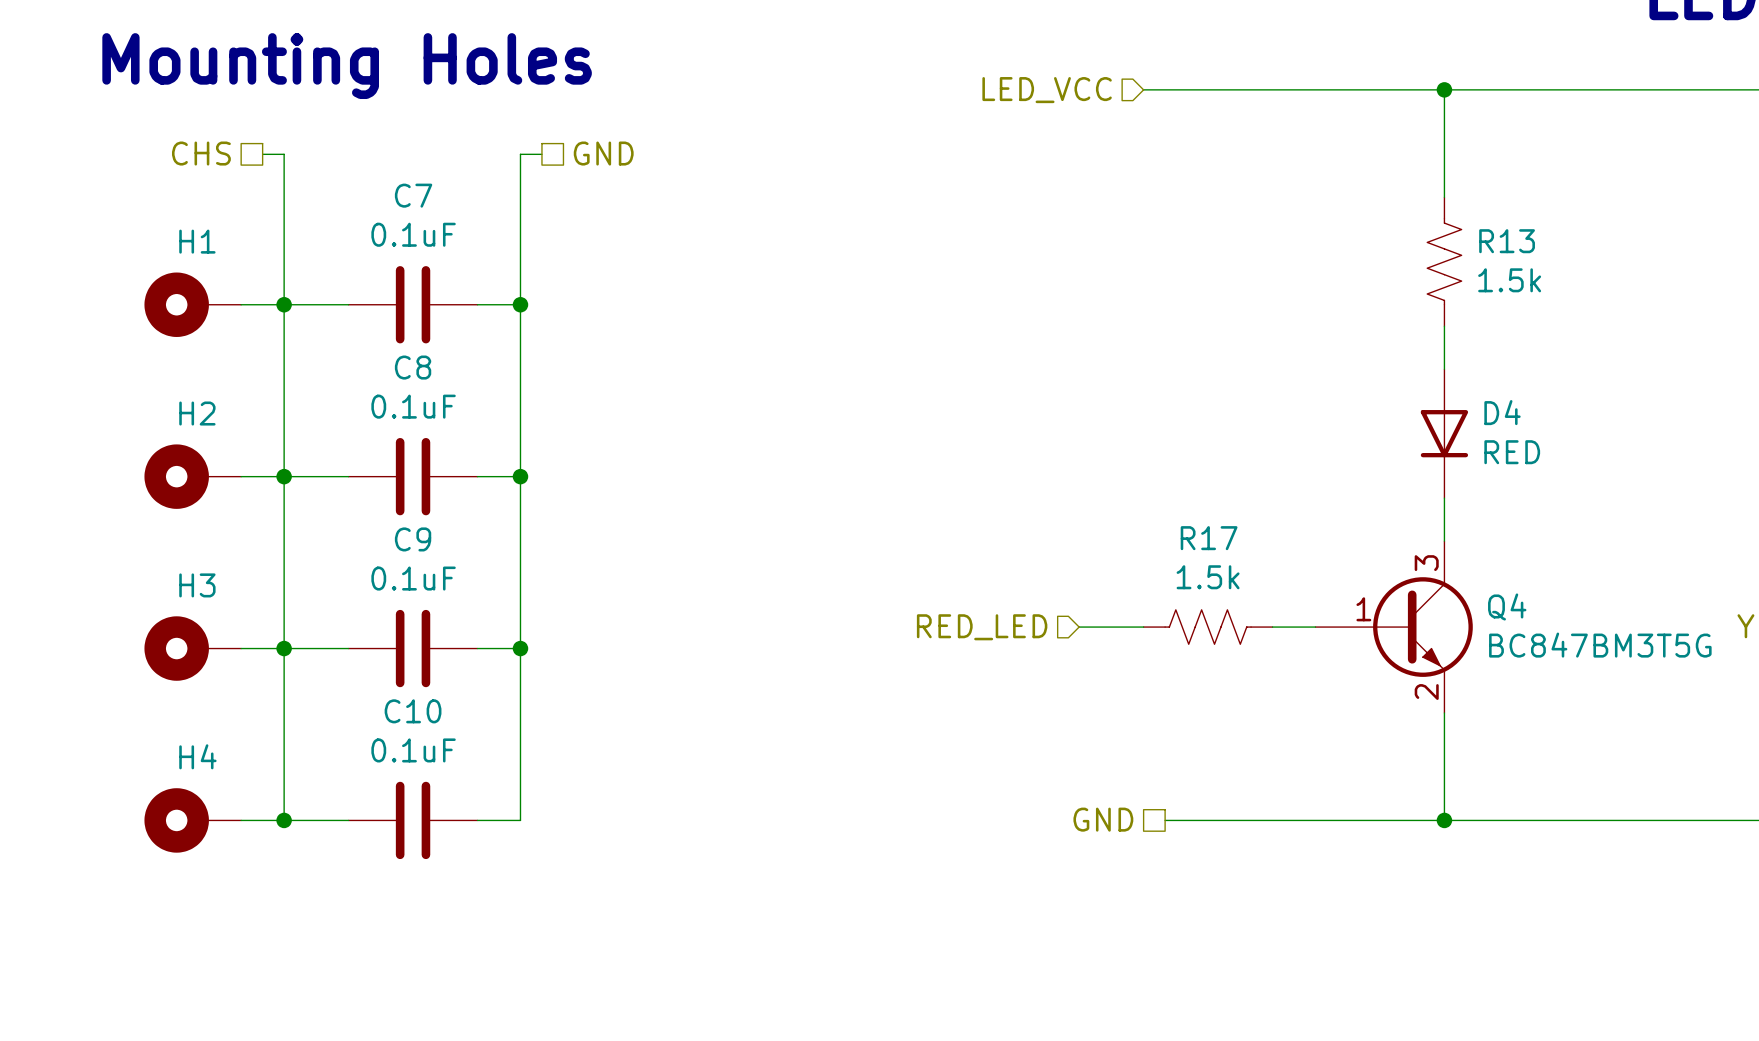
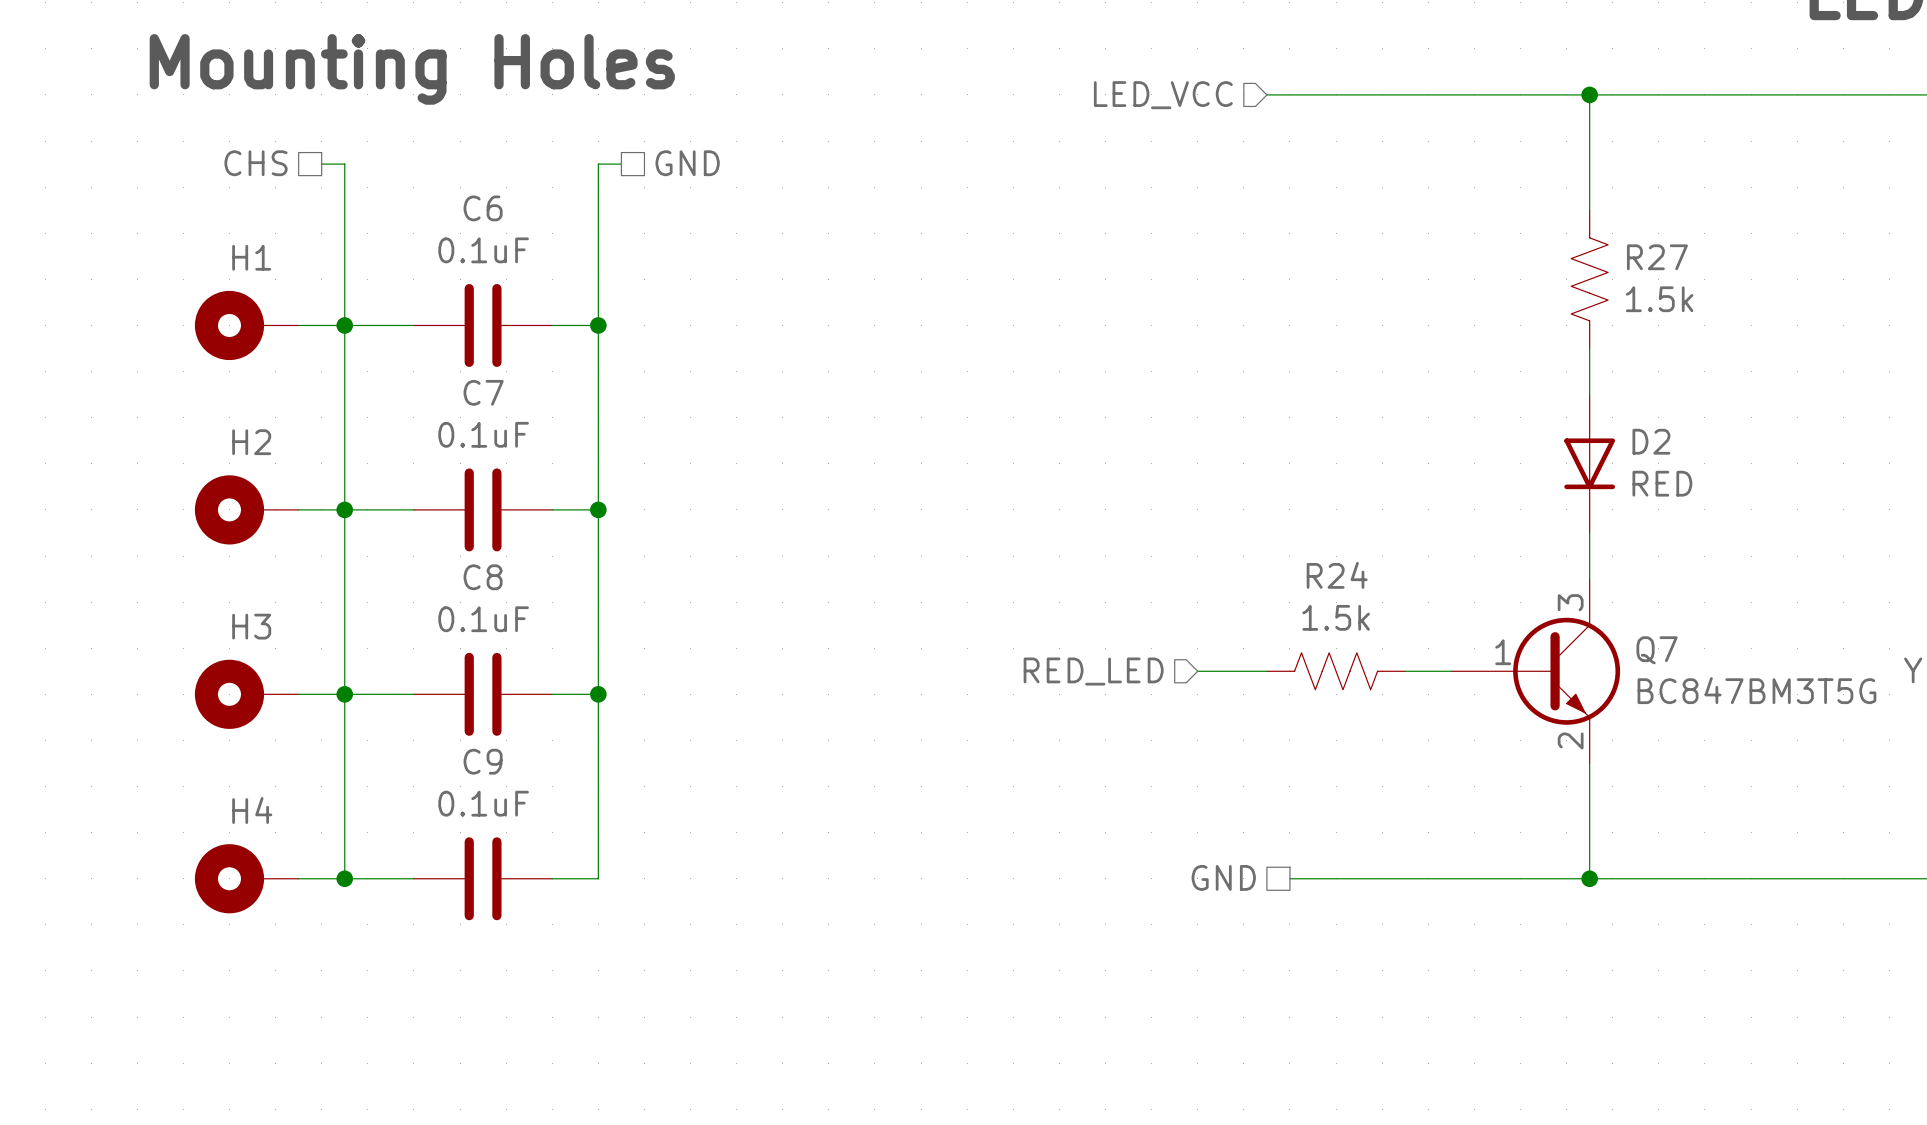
C7 name: C7 (413, 195) -> C6 (483, 208)
R13 name: R13 (1507, 241) -> R27 (1657, 257)
C8 name: C8 (413, 367) -> C7 (483, 392)
D4 name: D4 (1502, 412) -> D2 (1651, 441)
R17 name: R17 (1209, 538) -> R24 (1337, 575)
C9 name: C9 (413, 539) -> C8 (483, 577)
Q4 name: Q4 (1507, 606) -> Q7 (1657, 650)
C10 name: C10 (413, 711) -> C9 (483, 761)

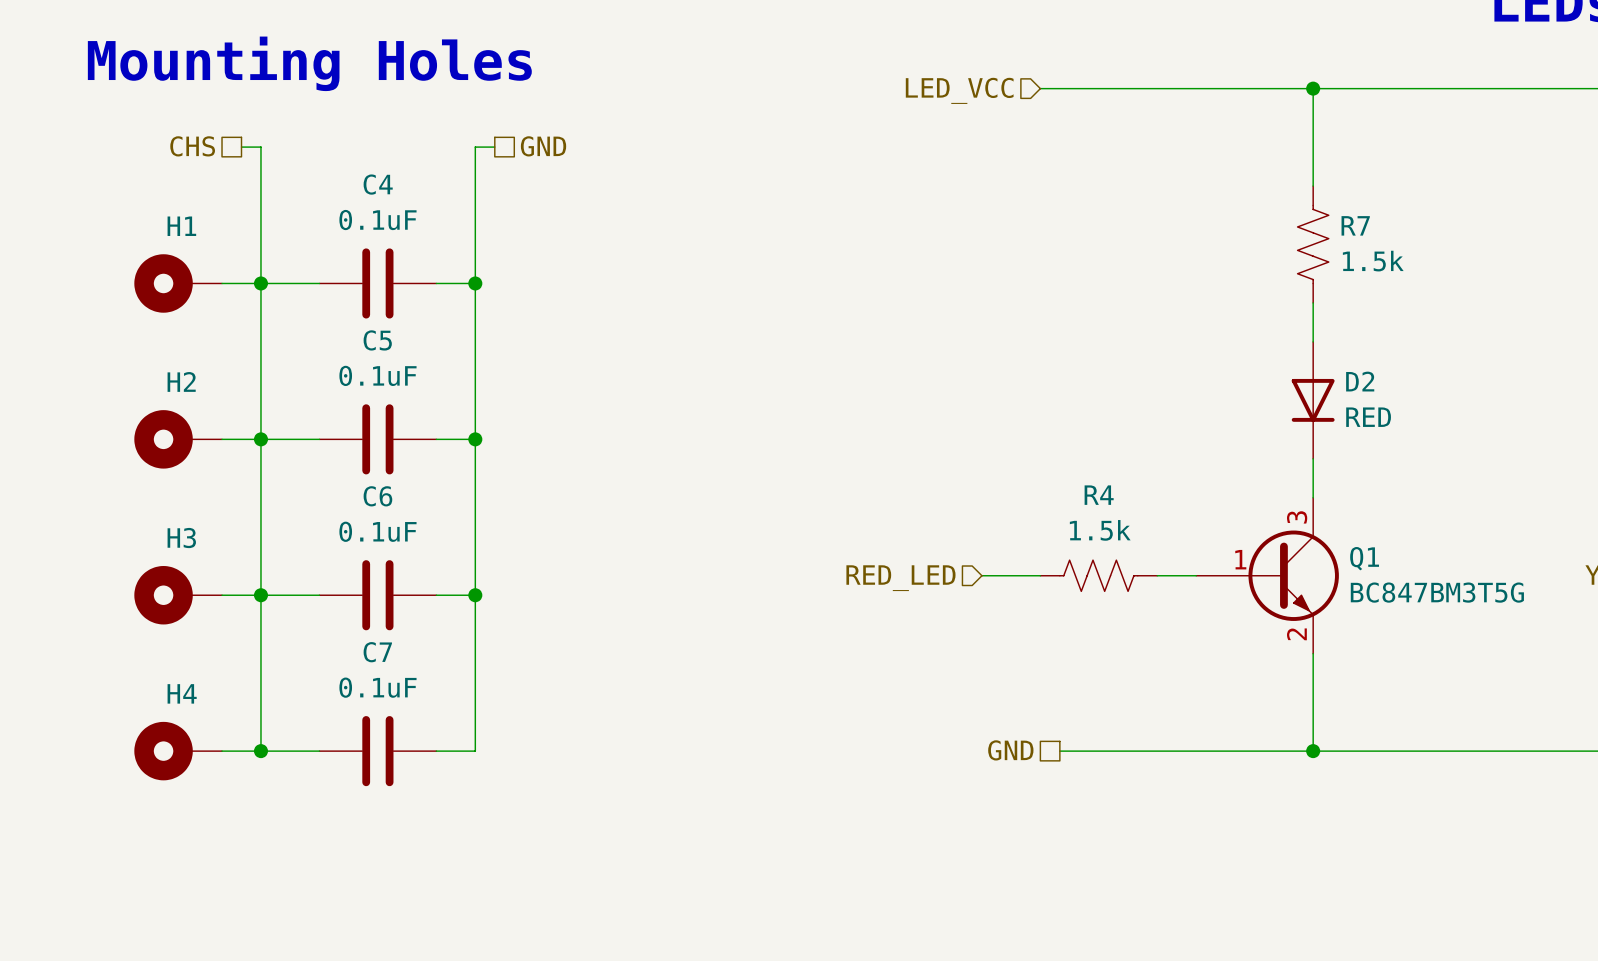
C6 name: C6 (483, 208) -> C4 (378, 184)
R27 name: R27 (1657, 257) -> R7 (1355, 225)
C7 name: C7 (483, 392) -> C5 (377, 340)
R24 name: R24 (1337, 575) -> R4 (1099, 495)
C8 name: C8 (483, 577) -> C6 (377, 496)
Q7 name: Q7 (1657, 650) -> Q1 (1364, 558)
C9 name: C9 (483, 761) -> C7 (377, 652)

